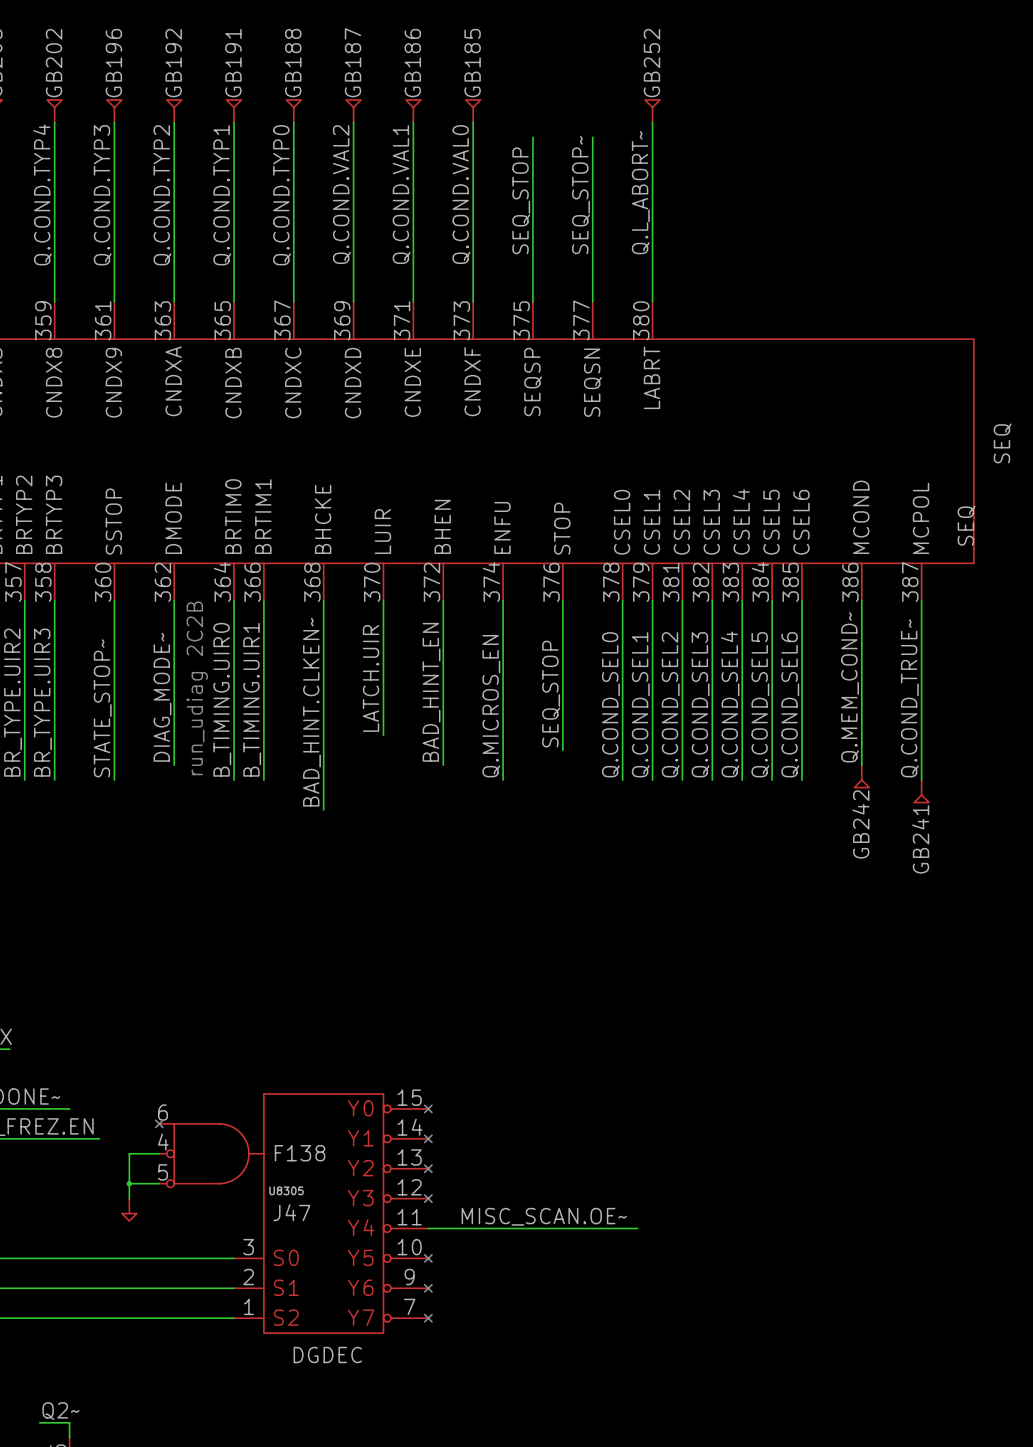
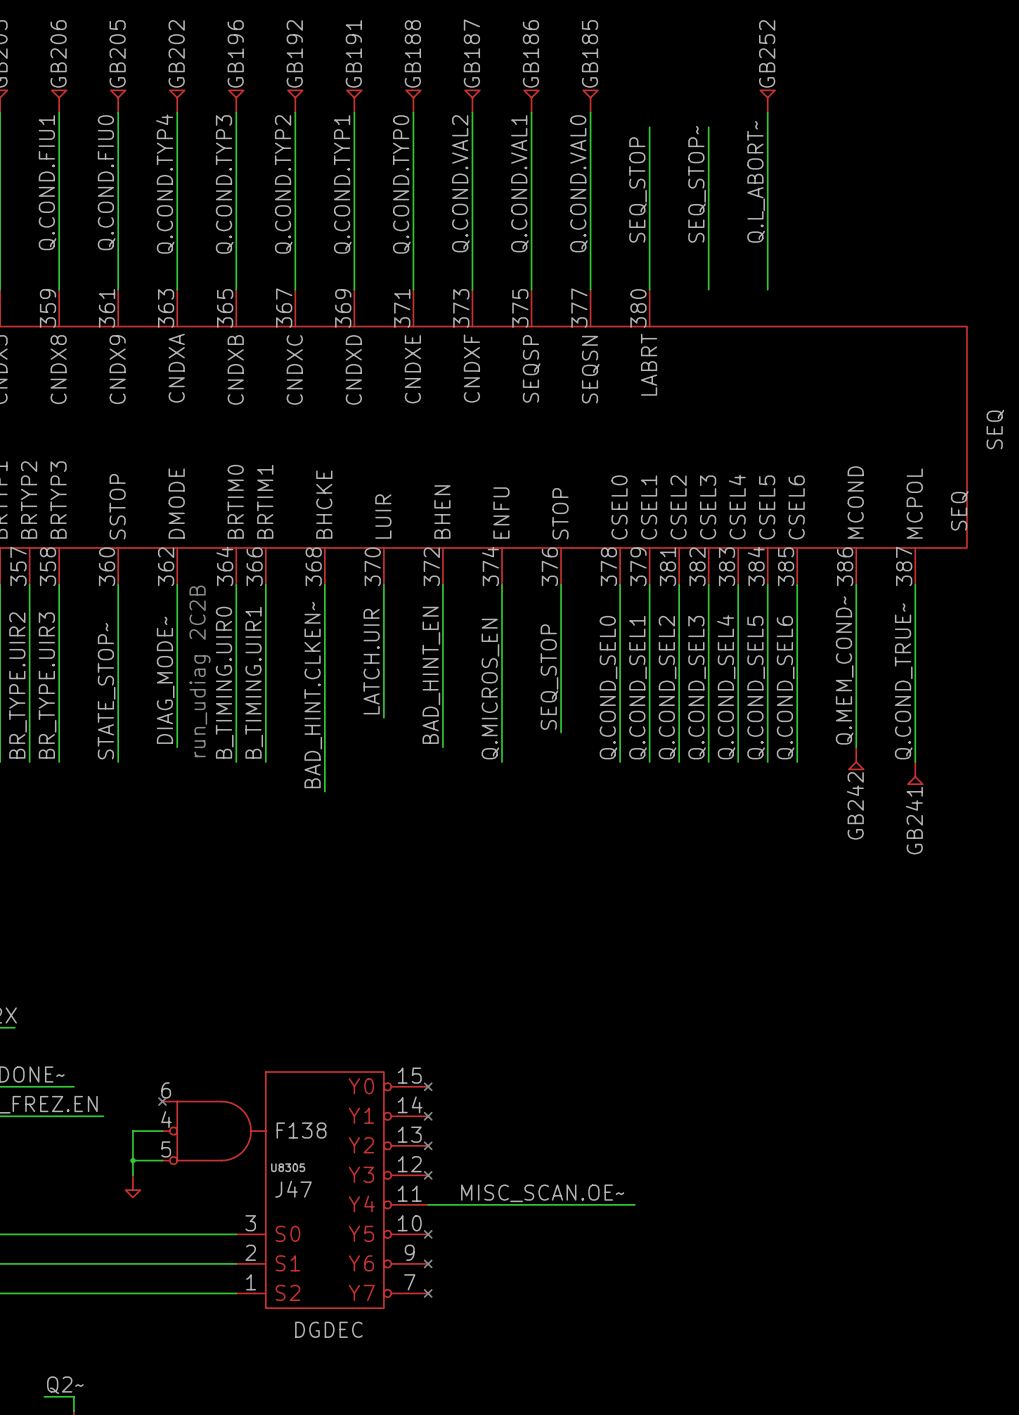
GB187 name: GB187 (353, 62) -> GB191 (353, 53)
GB202 name: GB202 (54, 63) -> GB206 (58, 53)
GB196 name: GB196 (113, 63) -> GB205 (117, 53)
GB192 name: GB192 (173, 63) -> GB202 (176, 53)
GB191 name: GB191 (233, 63) -> GB196 (235, 53)
GB188 name: GB188 (293, 63) -> GB192 (294, 53)
GB186 name: GB186 (412, 63) -> GB188 (412, 53)
GB185 name: GB185 (472, 63) -> GB187 (471, 53)
GB186: none -> (531, 101)
GB185: none -> (590, 101)
GB252 position: (652, 110) -> (767, 101)
wire: none -> (531, 112) (531, 127)
wire: (652, 122) (652, 137) -> (590, 112) (590, 127)
wire: none -> (767, 112) (767, 289)
wire: none -> (708, 127) (708, 289)
label: Q.L_ABORT~ (640, 192) -> SEQ_STOP (638, 189)
label: none -> Q.L_ABORT~ (756, 181)
label: Q.COND.TYP4 (42, 194) -> Q.COND.FIU1 (47, 182)
label: Q.COND.VAL2 (341, 194) -> Q.COND.TYP1 (342, 184)
label: Q.COND.VAL1 (401, 194) -> Q.COND.TYP0 (401, 184)
label: Q.COND.VAL0 (461, 194) -> Q.COND.VAL2 (460, 183)
label: none -> Q.COND.VAL1 (519, 183)
label: none -> Q.COND.VAL0 (578, 183)
label: Q.COND.TYP3 (102, 195) -> Q.COND.FIU0 (106, 182)
label: Q.COND.TYP2 (162, 195) -> Q.COND.TYP4 (165, 184)
label: Q.COND.TYP1 (222, 195) -> Q.COND.TYP3 (224, 184)
label: Q.COND.TYP0 (282, 195) -> Q.COND.TYP2 (283, 184)
label position: SEQ_STOP~ (581, 195) -> SEQ_STOP~ (697, 184)
label: SEQ_STOP (521, 200) -> none

